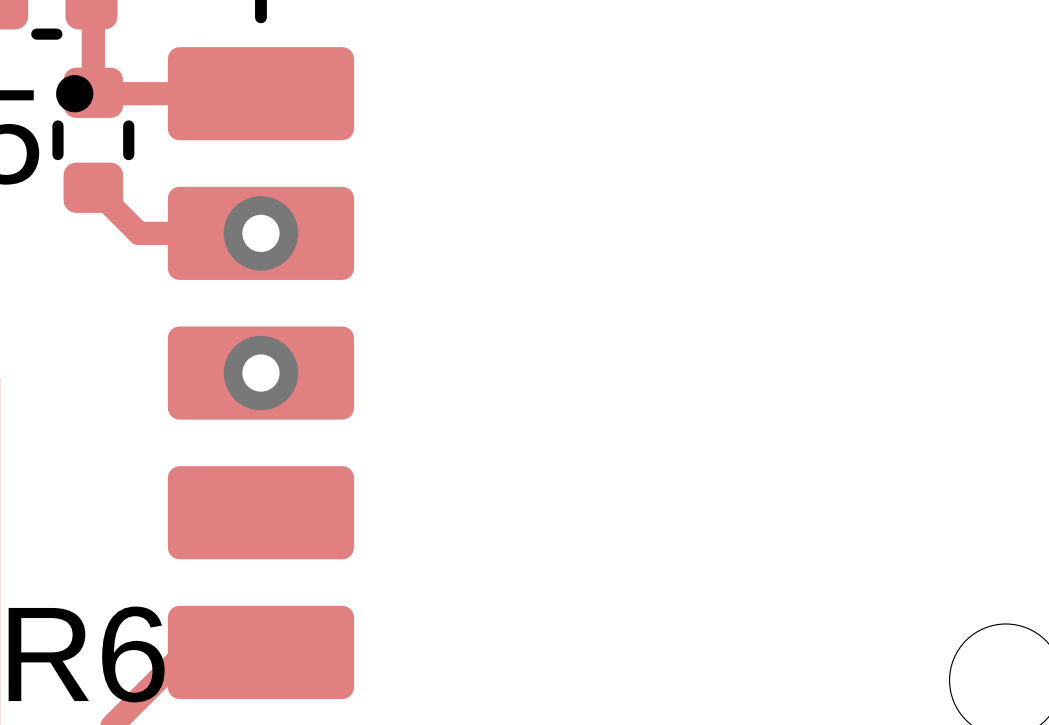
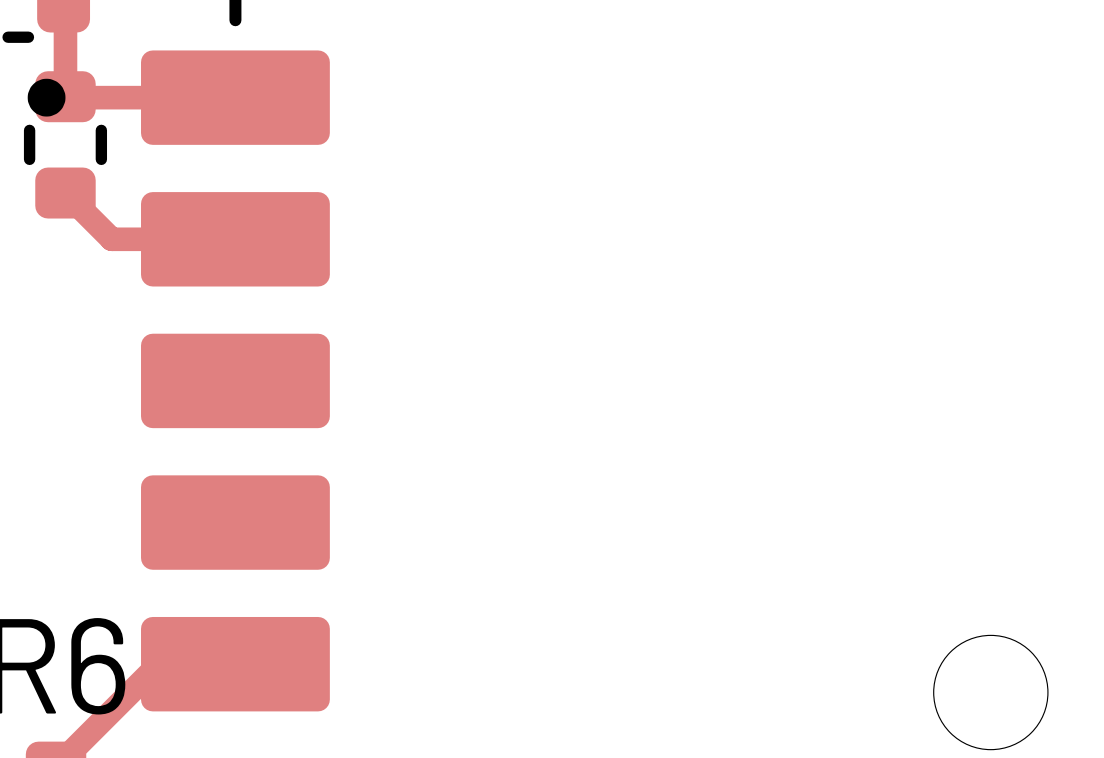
via: (260, 233) -> none
via: (260, 373) -> none

